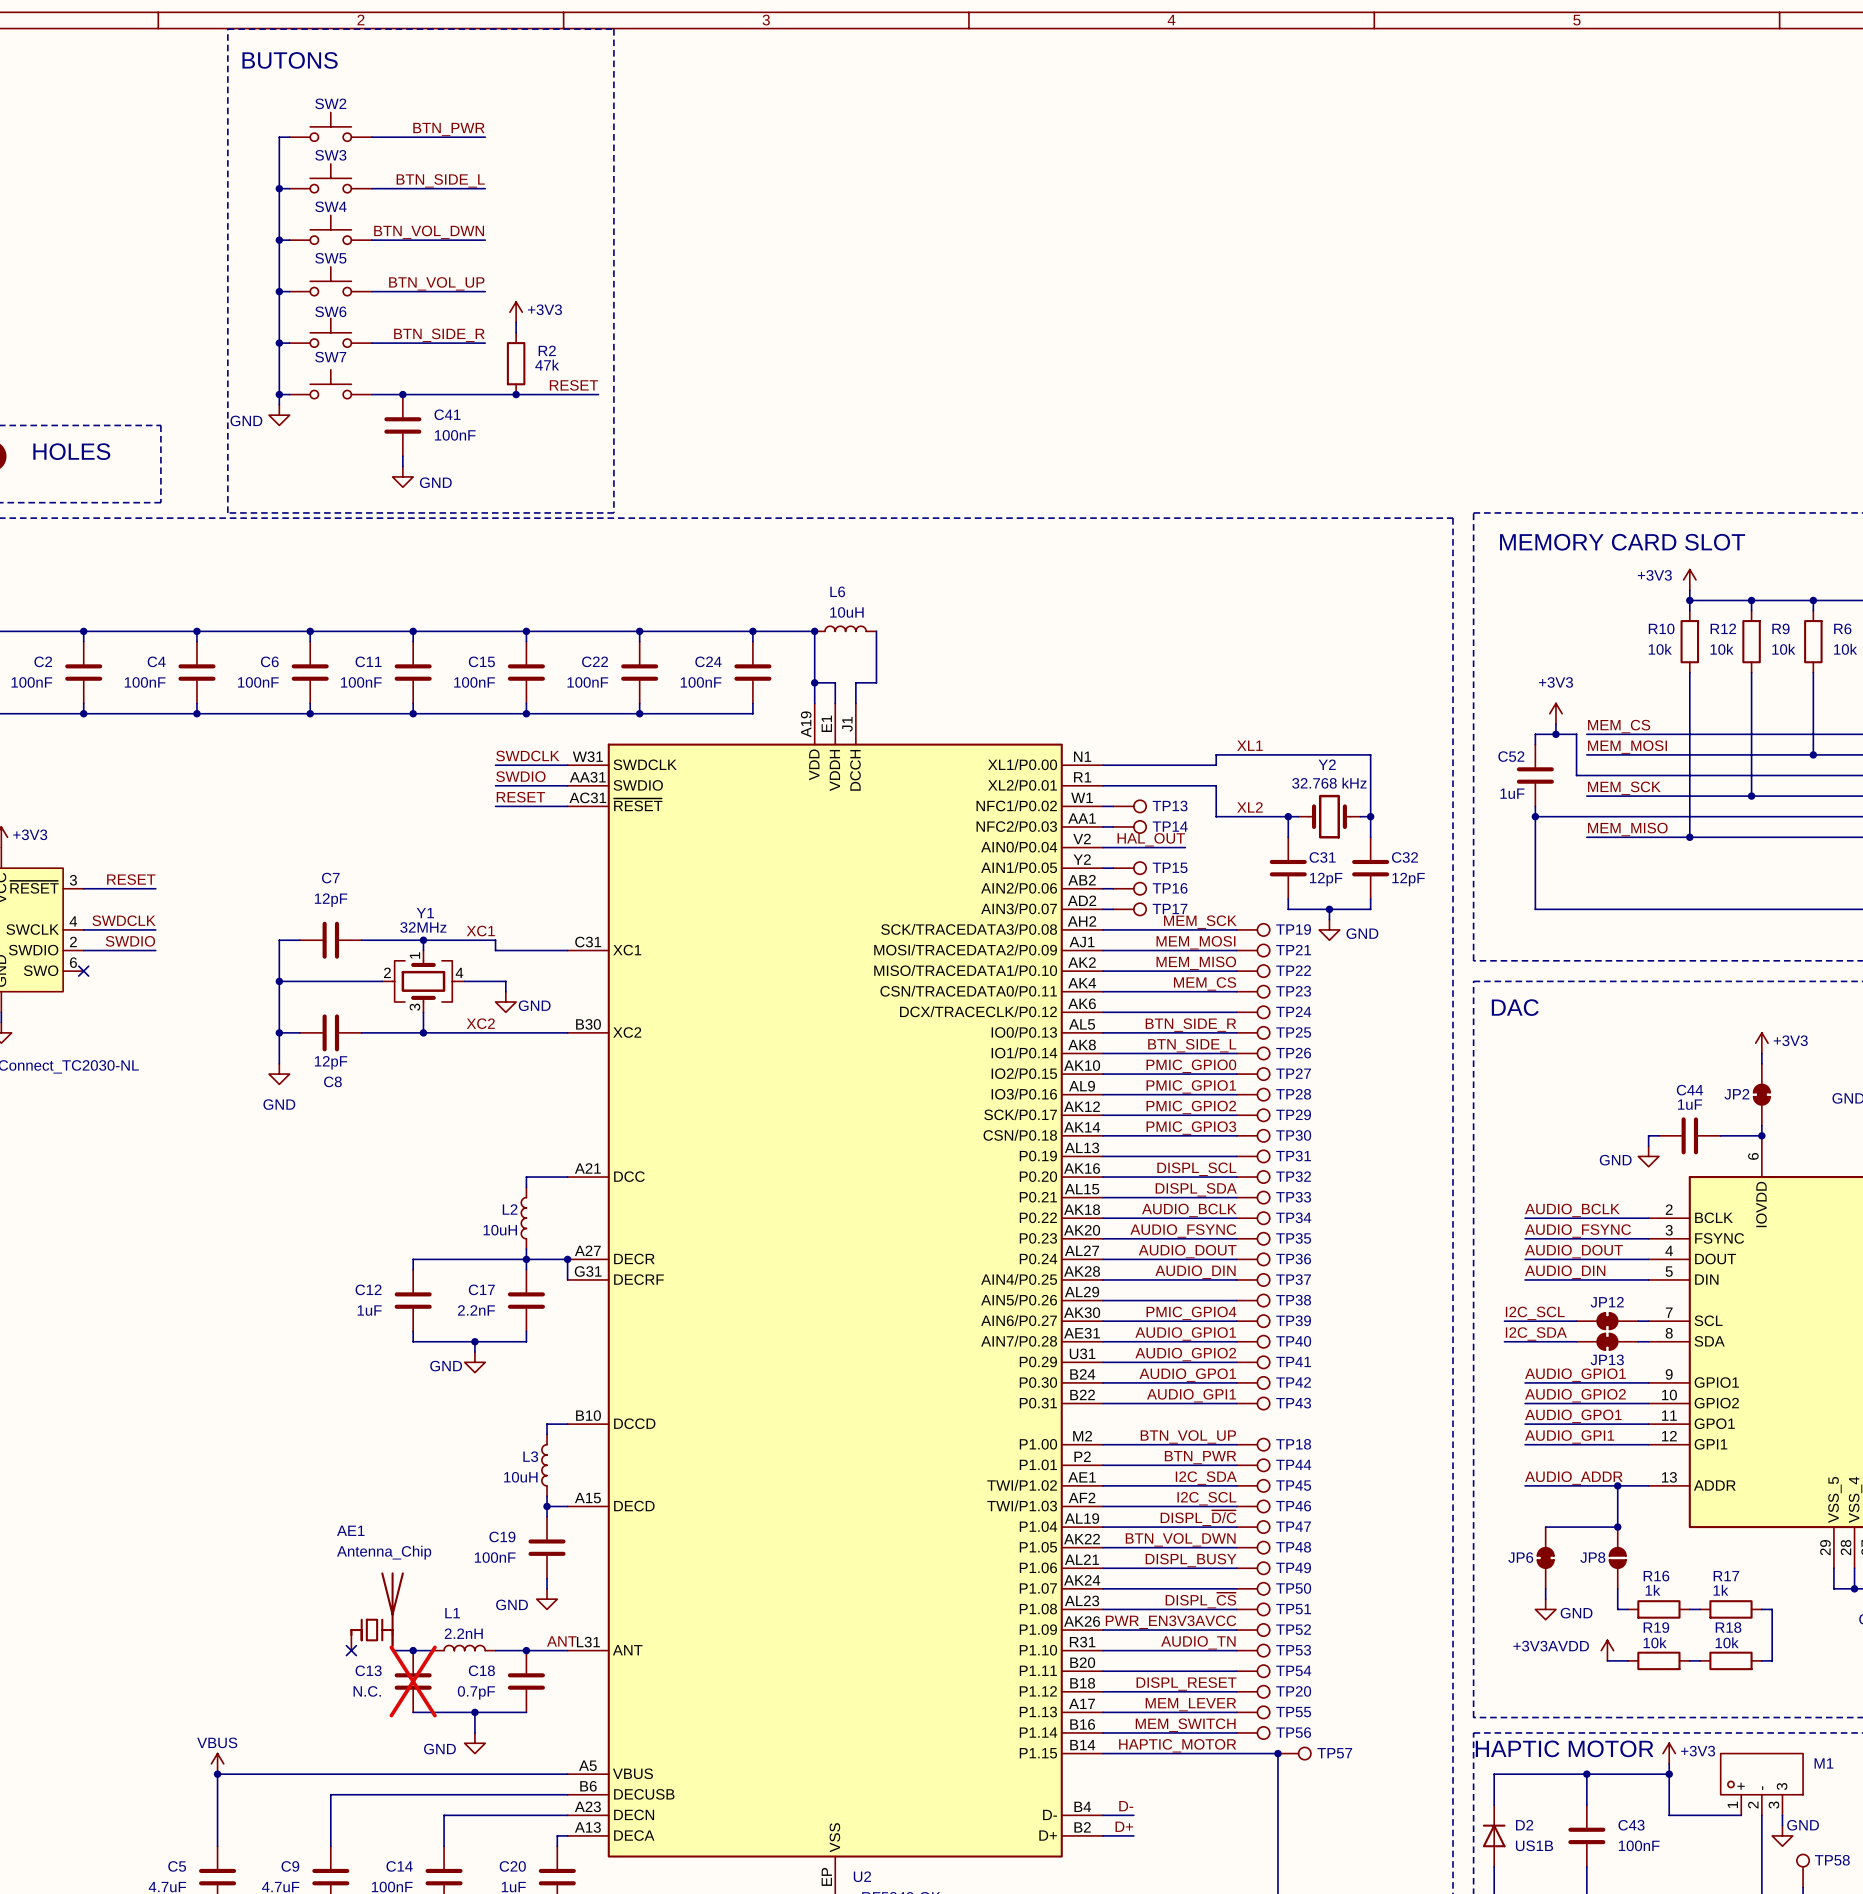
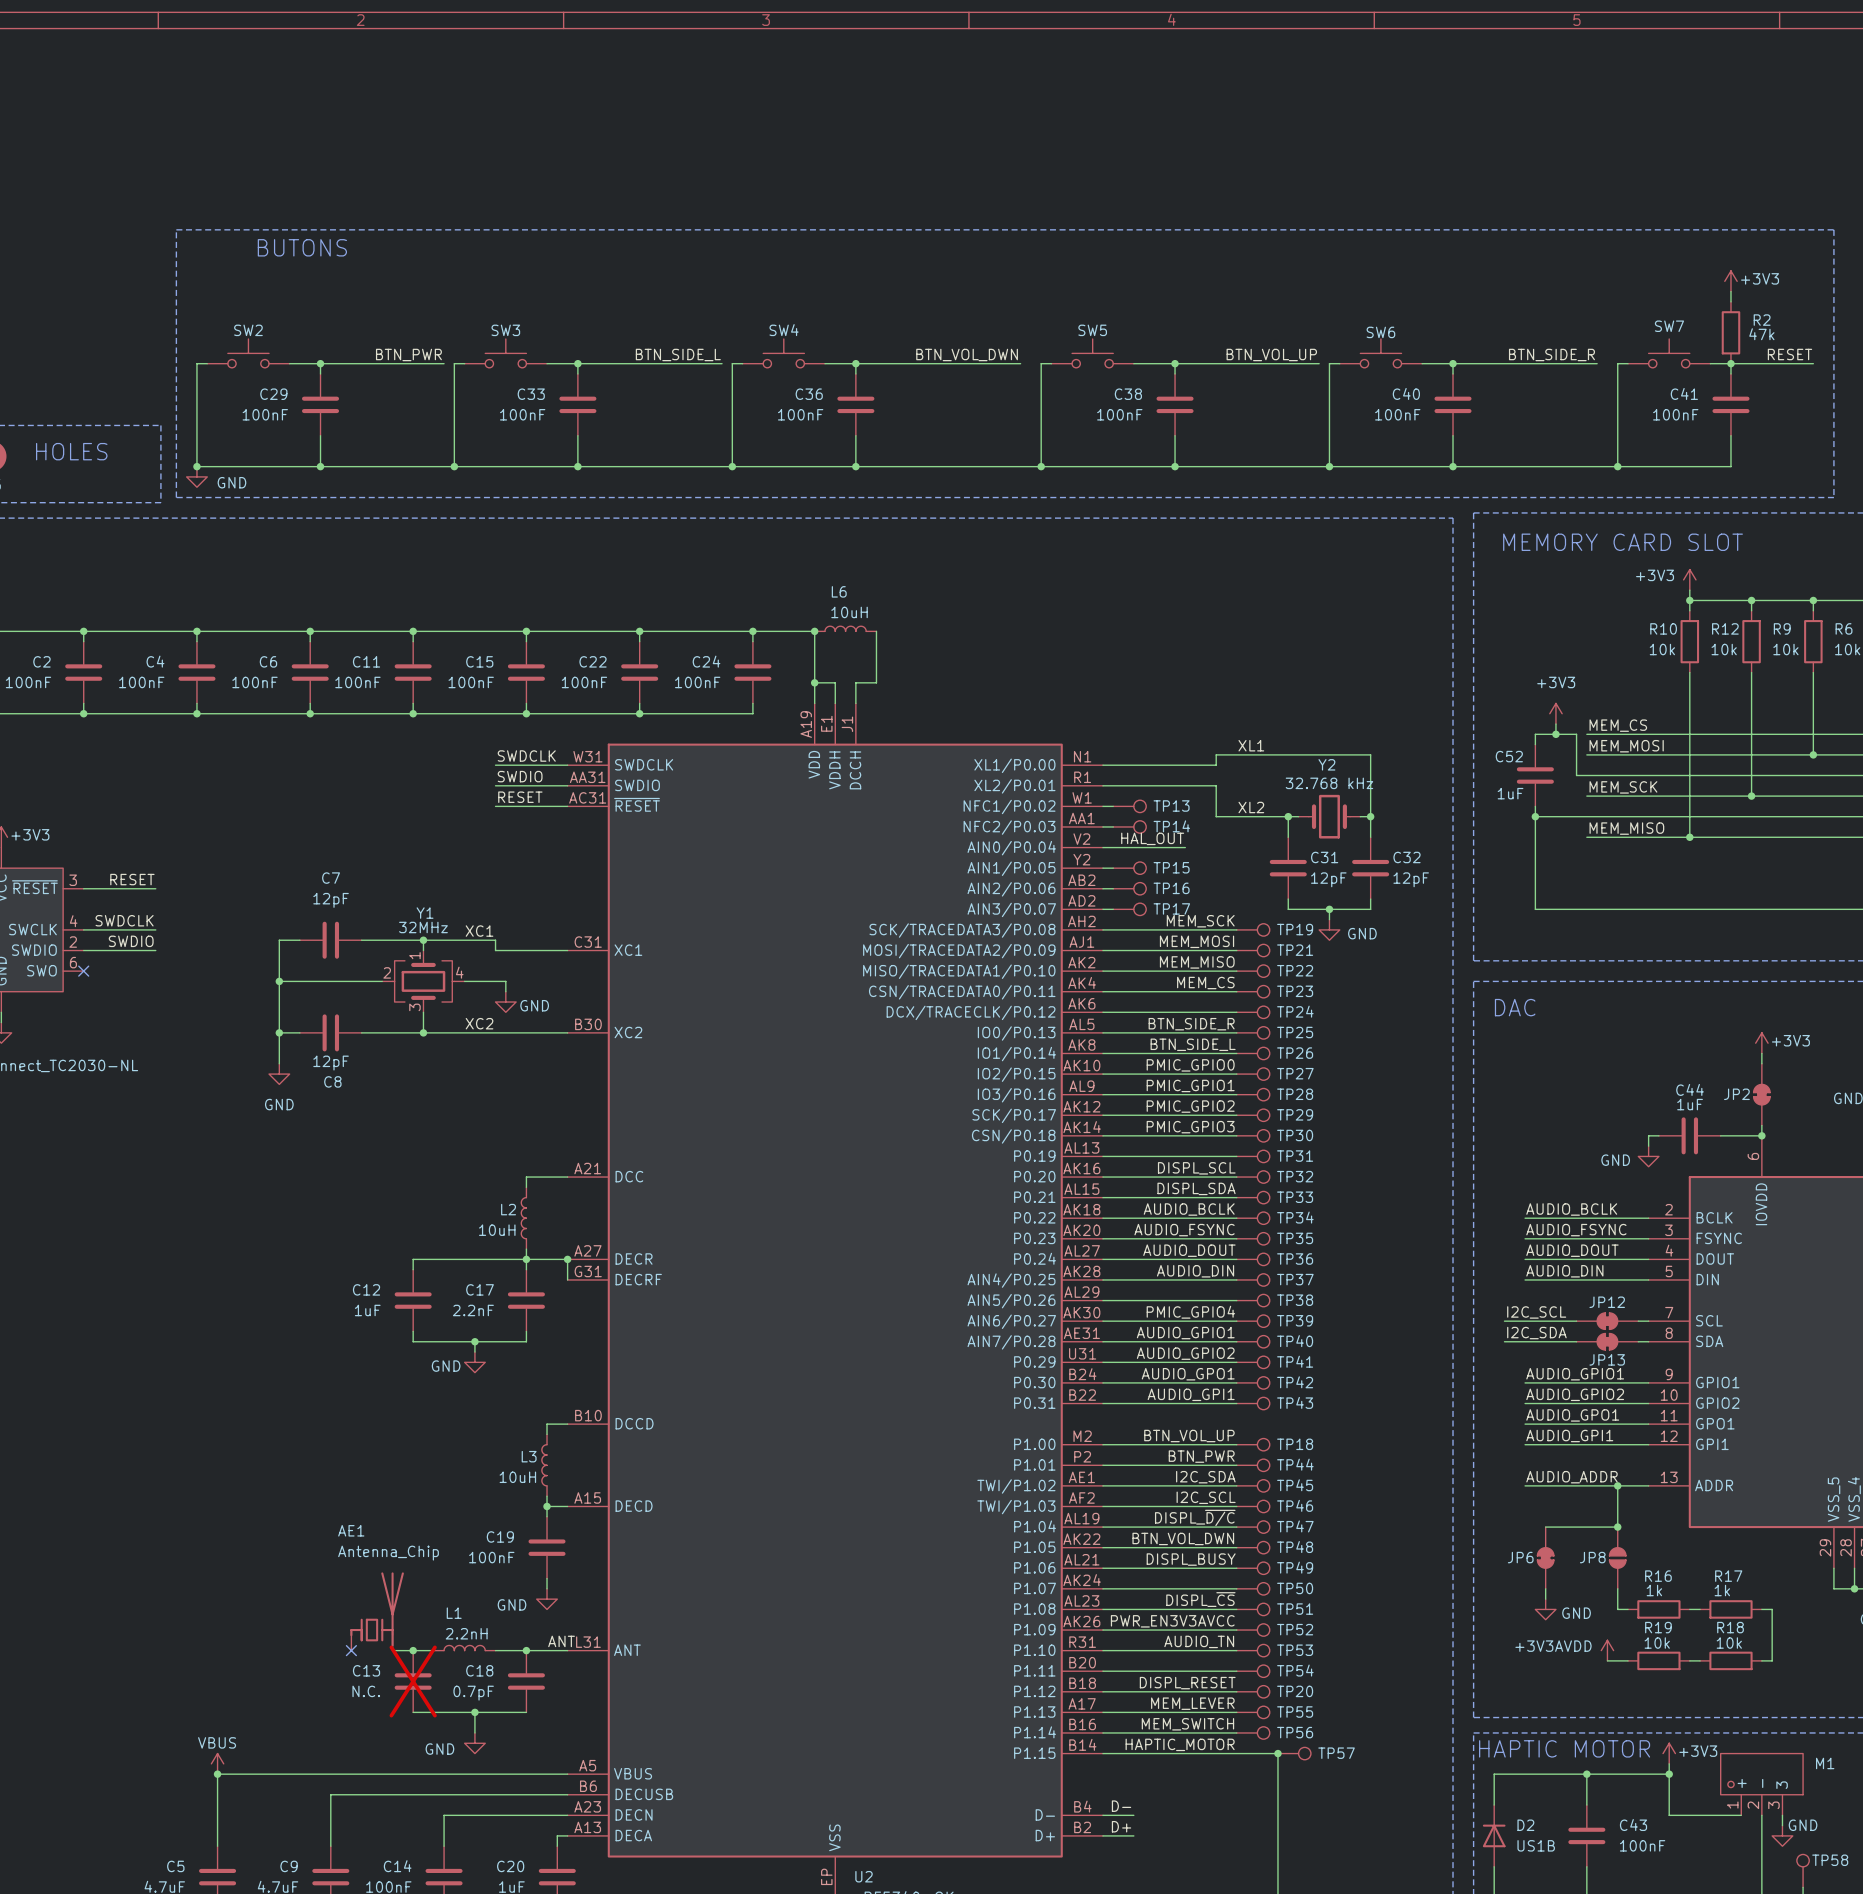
line: (227, 29) (613, 29) (613, 512) (227, 512) (227, 29) -> none
text position: BUTONS (290, 60) -> BUTONS (302, 247)
SW2 position: (330, 126) -> (248, 353)
label: BTN_PWR (448, 129) -> none
wire: (289, 137) (279, 137) (279, 404) -> none
wire: (371, 137) (485, 137) -> none
SW3 position: (330, 178) -> (505, 353)
label: BTN_SIDE_L (440, 180) -> none
wire: (279, 188) (289, 188) -> none
junction: (279, 188) -> none
wire: (371, 188) (485, 188) -> none
line: none -> (176, 229) (1833, 229) (1833, 497) (176, 497) (176, 229)
SW4 position: (330, 229) -> (783, 353)
label: BTN_VOL_DWN (429, 232) -> none
wire: (279, 240) (289, 240) -> none
junction: (279, 240) -> none
wire: (371, 240) (485, 240) -> none
SW5 position: (330, 281) -> (1092, 353)
power symbol: none -> +3V3 (1730, 281)
label: BTN_VOL_UP (436, 283) -> none
wire: (279, 291) (289, 291) -> none
junction: (279, 291) -> none
wire: (371, 291) (485, 291) -> none
wire: none -> (1730, 291) (1730, 301)
power symbol: +3V3 (516, 312) -> none
wire: (516, 322) (516, 332) -> (577, 363) (577, 373)
SW6 position: (330, 332) -> (1380, 353)
label: BTN_SIDE_R (439, 335) -> none
wire: (279, 343) (289, 343) -> none
junction: (279, 343) -> none
wire: (371, 343) (485, 343) -> none
label: none -> RESET (1789, 354)
label: none -> BTN_PWR (408, 354)
label: none -> BTN_SIDE_L (678, 354)
label: none -> BTN_VOL_DWN (967, 354)
label: none -> BTN_VOL_UP (1271, 354)
label: none -> BTN_SIDE_R (1551, 354)
wire: none -> (207, 363) (196, 363) (196, 466) (1730, 466) (1730, 435)
wire: none -> (289, 363) (444, 363)
junction: none -> (320, 363)
wire: none -> (464, 363) (454, 363) (454, 466)
R2 position: (516, 363) -> (1730, 332)
wire: none -> (547, 363) (722, 363)
junction: none -> (577, 363)
wire: none -> (742, 363) (732, 363) (732, 466)
wire: none -> (824, 363) (1020, 363)
wire: none -> (855, 363) (855, 373)
junction: none -> (855, 363)
wire: none -> (1051, 363) (1041, 363) (1041, 466)
wire: none -> (1133, 363) (1319, 363)
wire: none -> (1175, 363) (1175, 373)
junction: none -> (1175, 363)
wire: none -> (1339, 363) (1329, 363) (1329, 466)
wire: none -> (1422, 363) (1597, 363)
wire: none -> (1453, 363) (1453, 373)
junction: none -> (1453, 363)
wire: none -> (1628, 363) (1617, 363) (1617, 466)
wire: none -> (1710, 363) (1813, 363)
wire: none -> (1730, 363) (1730, 373)
junction: none -> (1730, 363)
SW7 position: (330, 384) -> (1669, 353)
label: RESET (573, 385) -> none
wire: (279, 394) (289, 394) -> none
junction: (279, 394) -> none
wire: (371, 394) (598, 394) -> none
junction: (402, 394) -> none
junction: (516, 394) -> none
C29: none -> 100nF (320, 404)
C33: none -> 100nF (577, 404)
C36: none -> 100nF (855, 404)
C38: none -> 100nF (1175, 404)
C40: none -> 100nF (1453, 404)
C41 name position: C41 (447, 414) -> C41 (1684, 393)
power symbol: GND (279, 415) -> none
C41 position: (402, 425) -> (1730, 404)
wire: none -> (320, 435) (320, 466)
C41 value position: 100nF (455, 435) -> 100nF (1675, 414)
wire: none -> (577, 435) (577, 466)
wire: none -> (855, 435) (855, 466)
wire: none -> (1175, 435) (1175, 466)
wire: none -> (1453, 435) (1453, 466)
wire: (402, 456) (402, 466) -> (320, 363) (320, 373)
junction: none -> (196, 466)
junction: none -> (320, 466)
junction: none -> (454, 466)
junction: none -> (577, 466)
junction: none -> (732, 466)
junction: none -> (855, 466)
junction: none -> (1041, 466)
junction: none -> (1175, 466)
junction: none -> (1329, 466)
junction: none -> (1453, 466)
junction: none -> (1617, 466)
power symbol: none -> GND (196, 476)
power symbol: GND (402, 476) -> none

